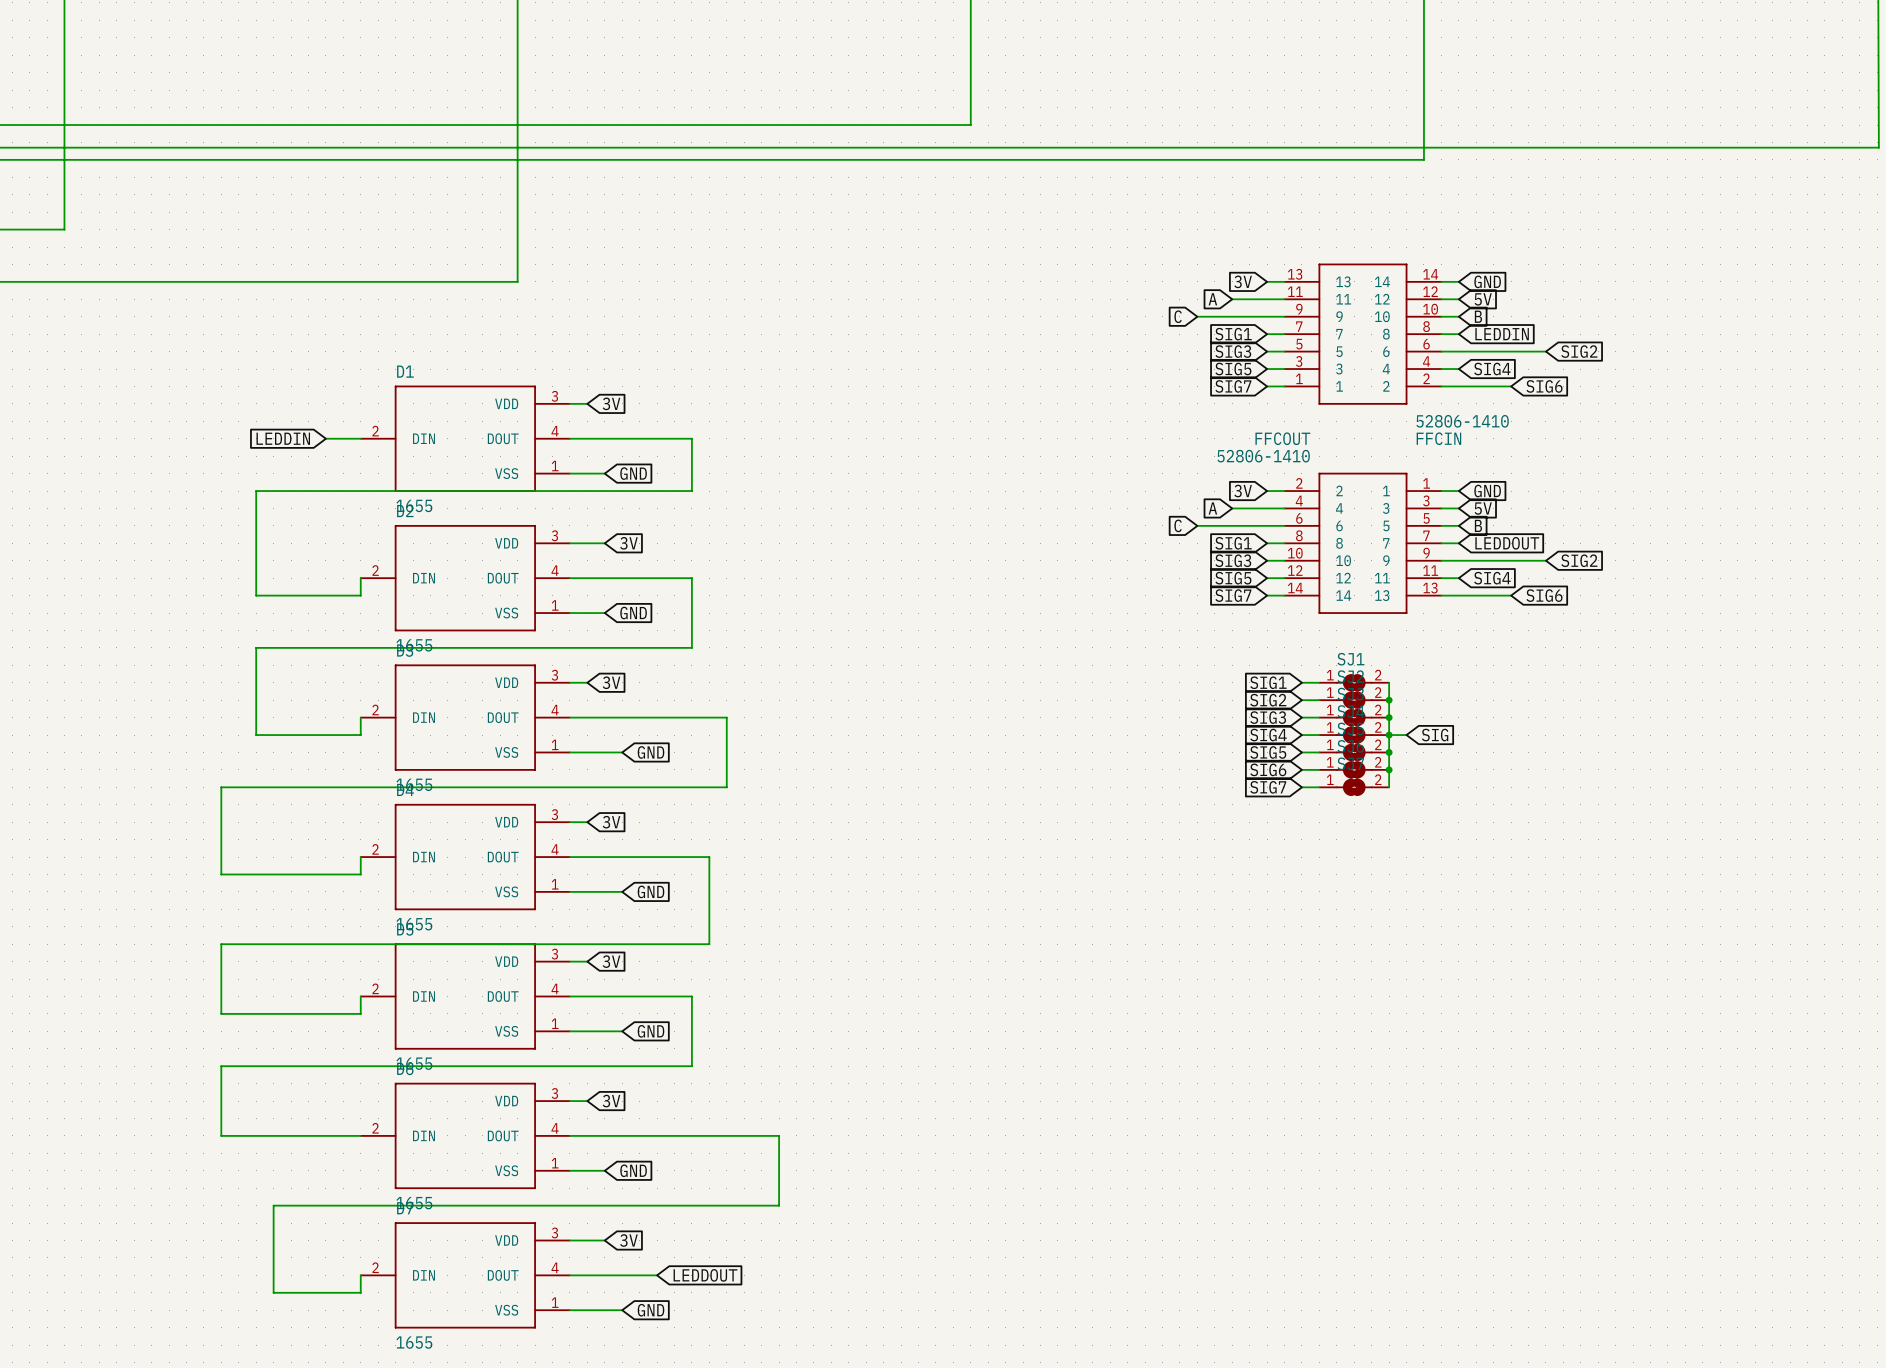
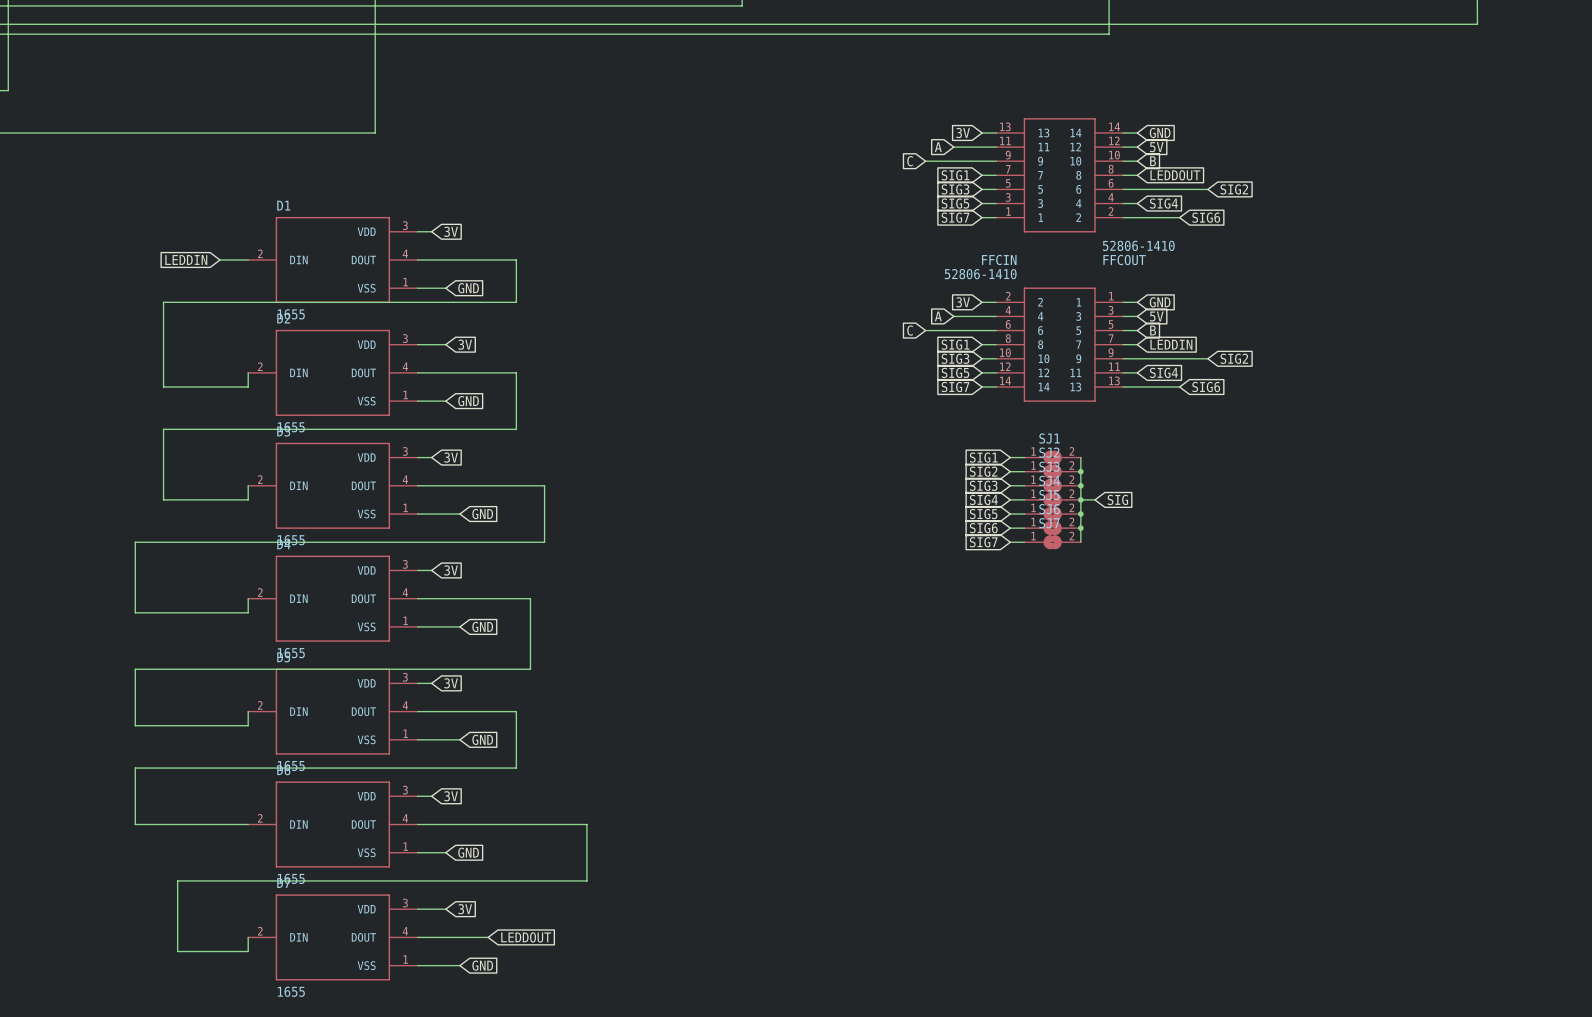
global label: LEDDIN (1502, 334) -> LEDDOUT (1175, 175)
FFCOUT name: FFCOUT (1282, 438) -> FFCIN (999, 260)
FFCIN name: FFCIN (1438, 438) -> FFCOUT (1124, 260)
global label: LEDDOUT (1507, 543) -> LEDDIN (1171, 344)

